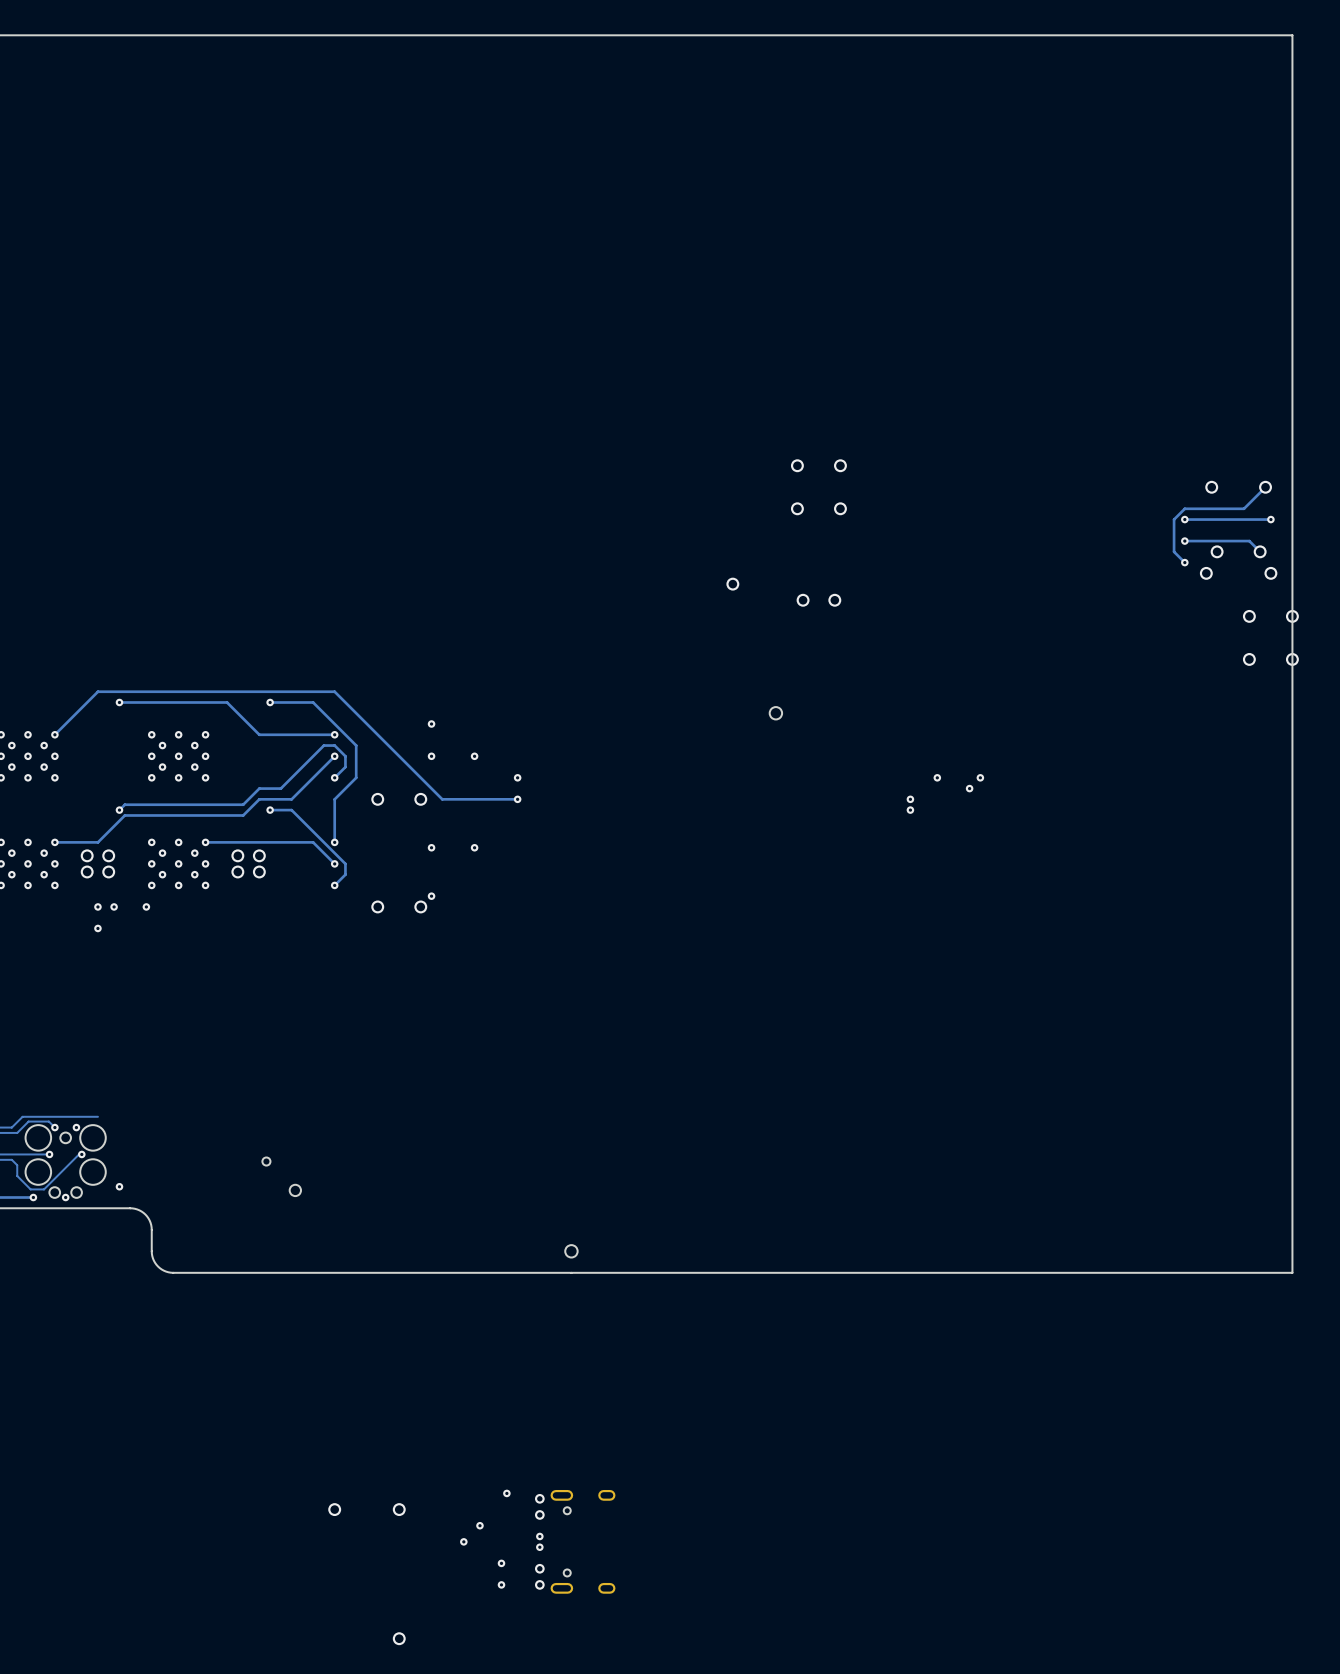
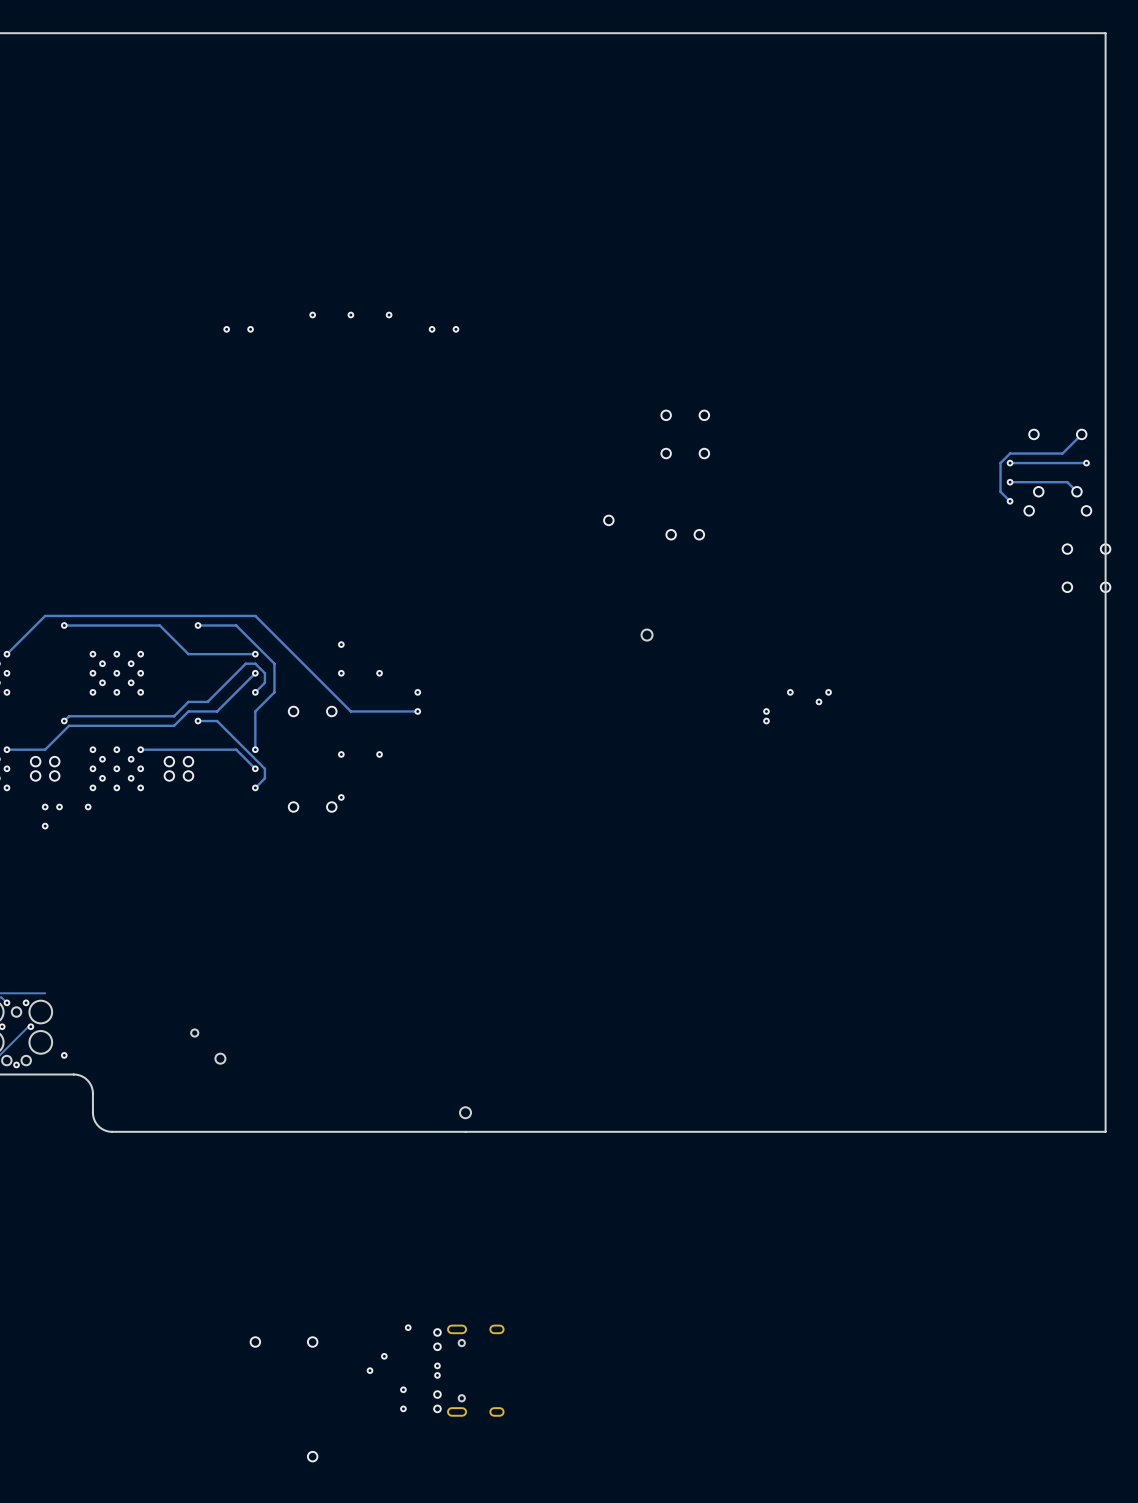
via: none -> (312, 315)
via: none -> (350, 315)
via: none -> (389, 315)
via: none -> (226, 329)
via: none -> (250, 329)
via: none -> (432, 329)
via: none -> (455, 329)

